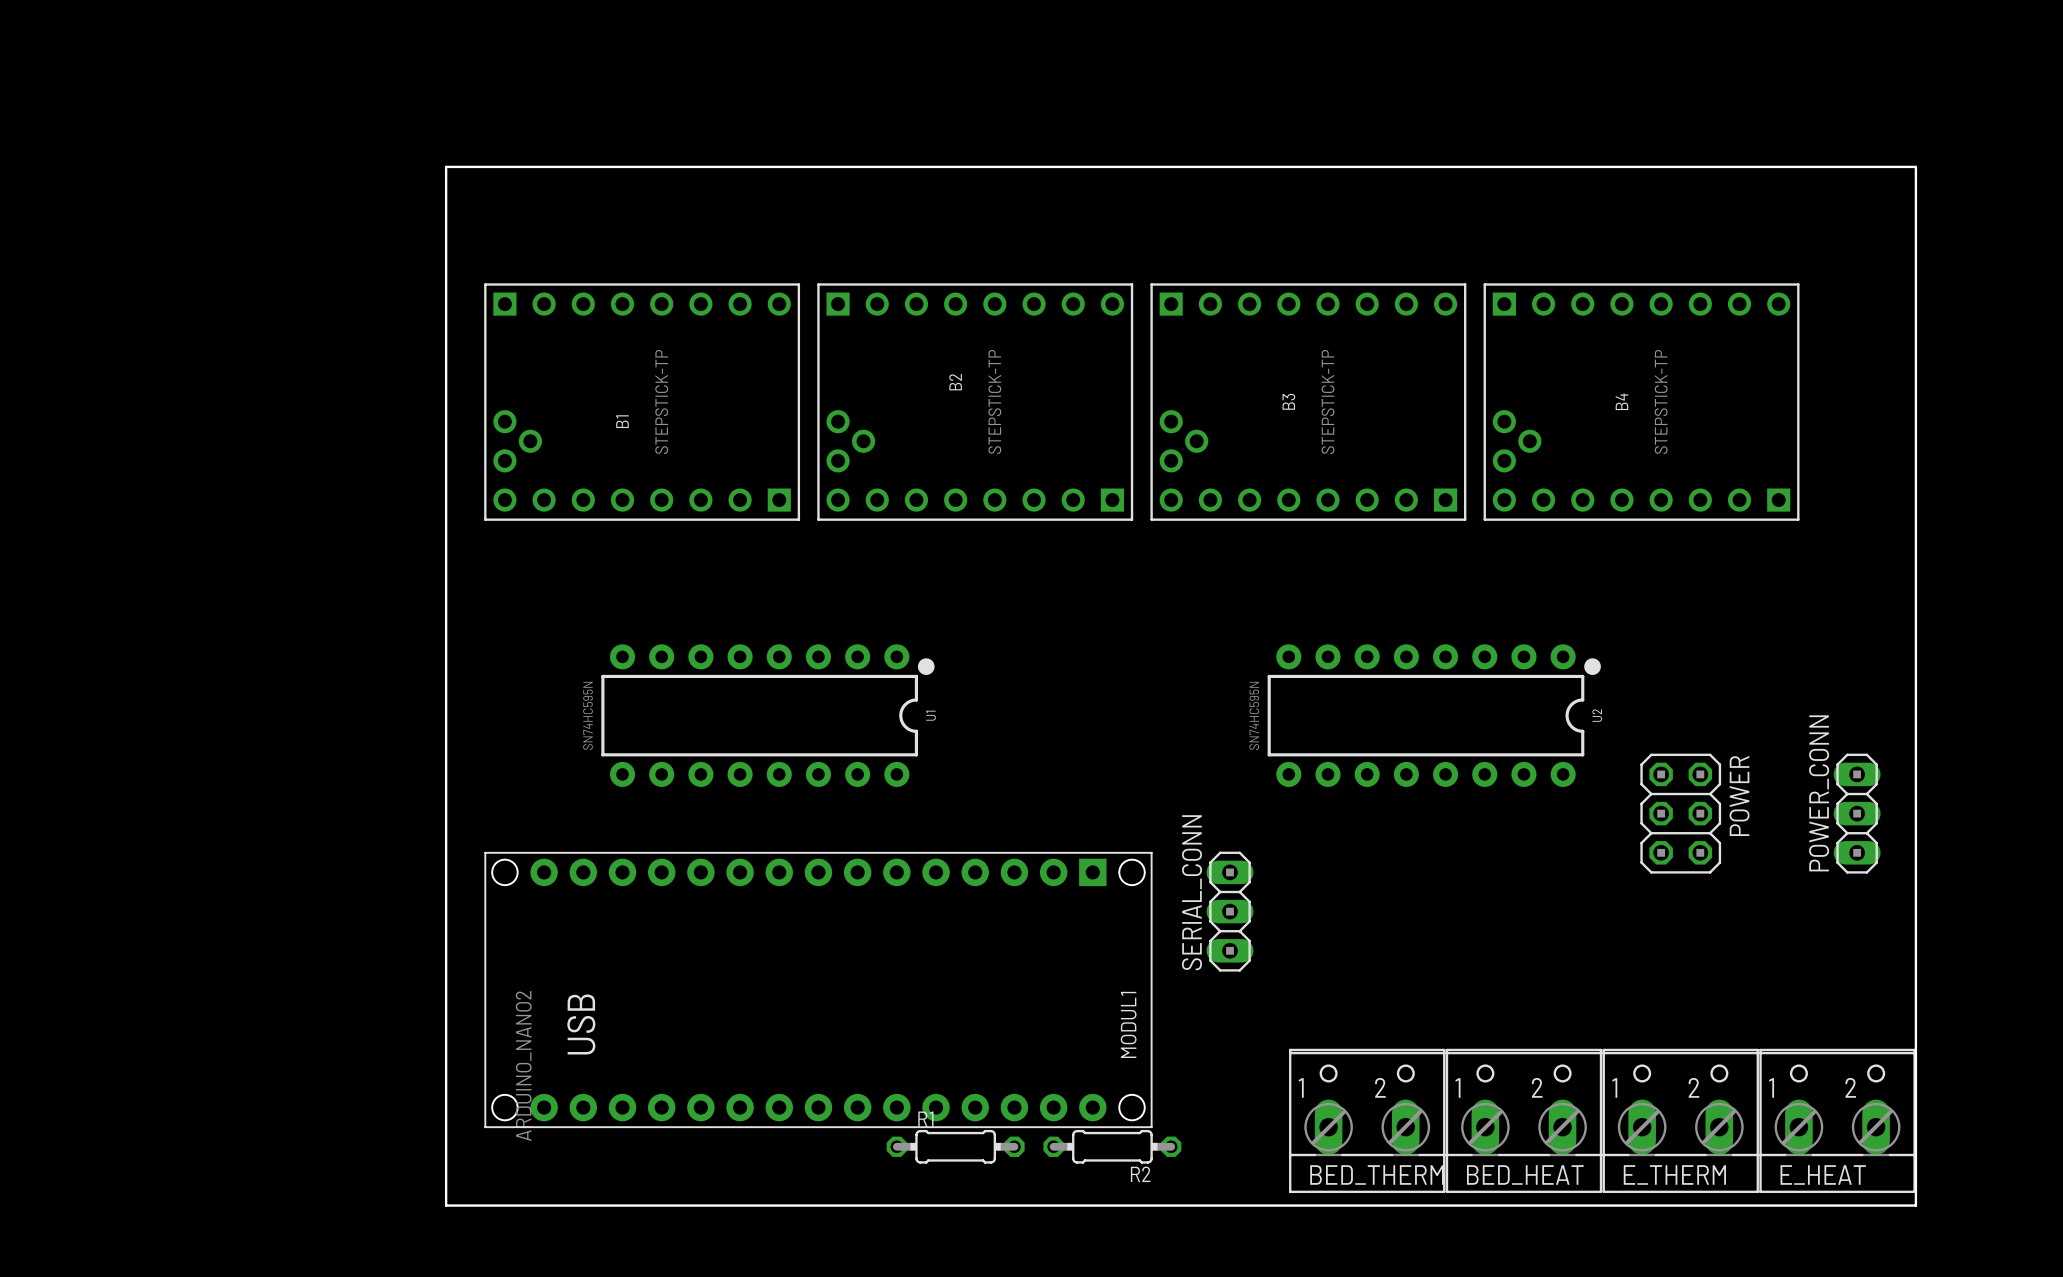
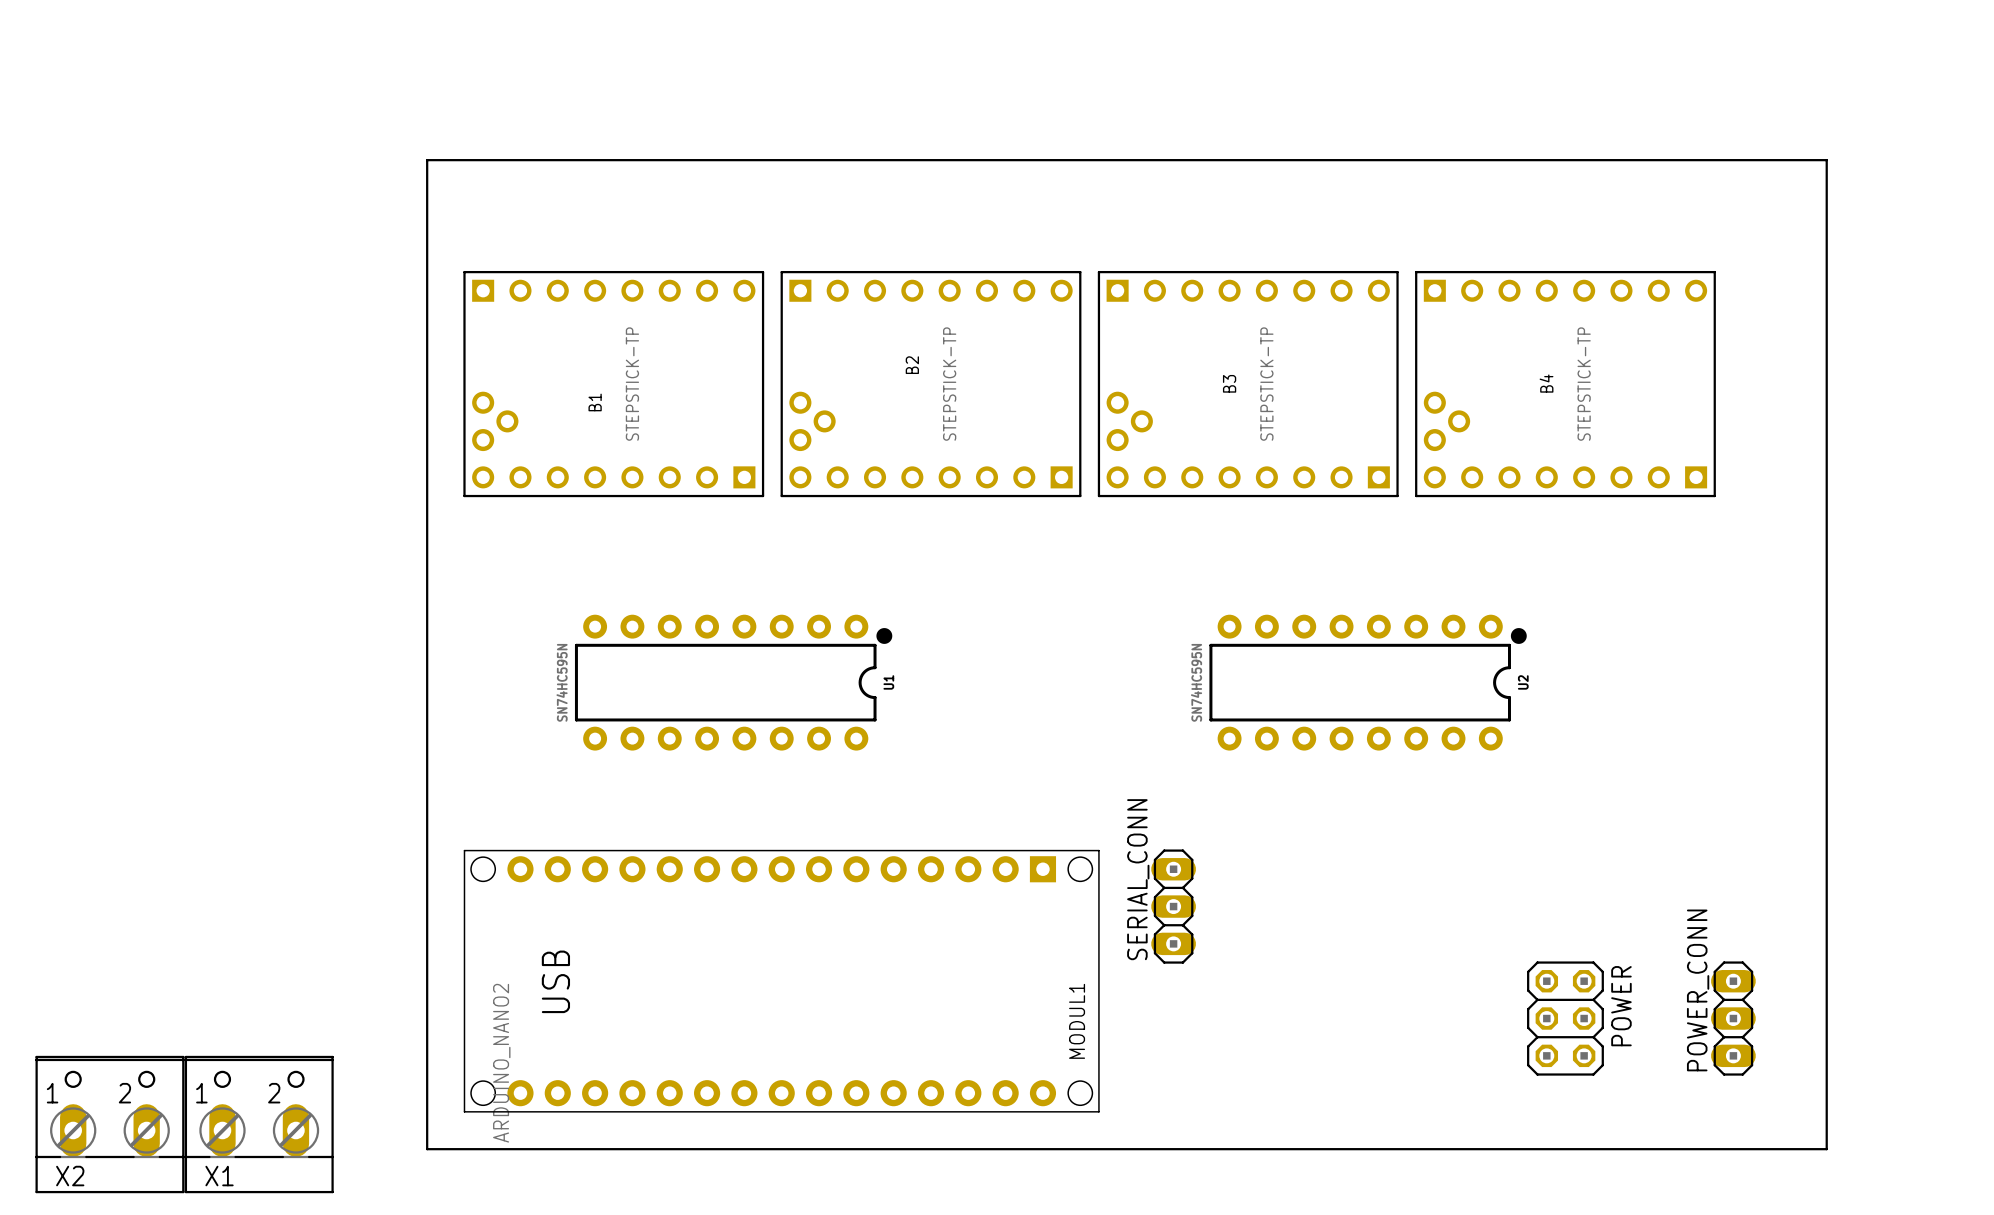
POWER position: (1680, 813) -> (1565, 1018)
POWER_CONN position: (1857, 813) -> (1733, 1018)
SERIAL_CONN position: (1230, 911) -> (1173, 906)
MODUL1 position: (818, 989) -> (781, 981)
BED_THERM: (1367, 1120) -> none
BED_HEAT: (1523, 1120) -> none
E_THERM: (1680, 1120) -> none
E_HEAT: (1837, 1120) -> none
R1: (955, 1146) -> none
R2: (1112, 1146) -> none
X2: none -> (109, 1124)
X1: none -> (259, 1124)

